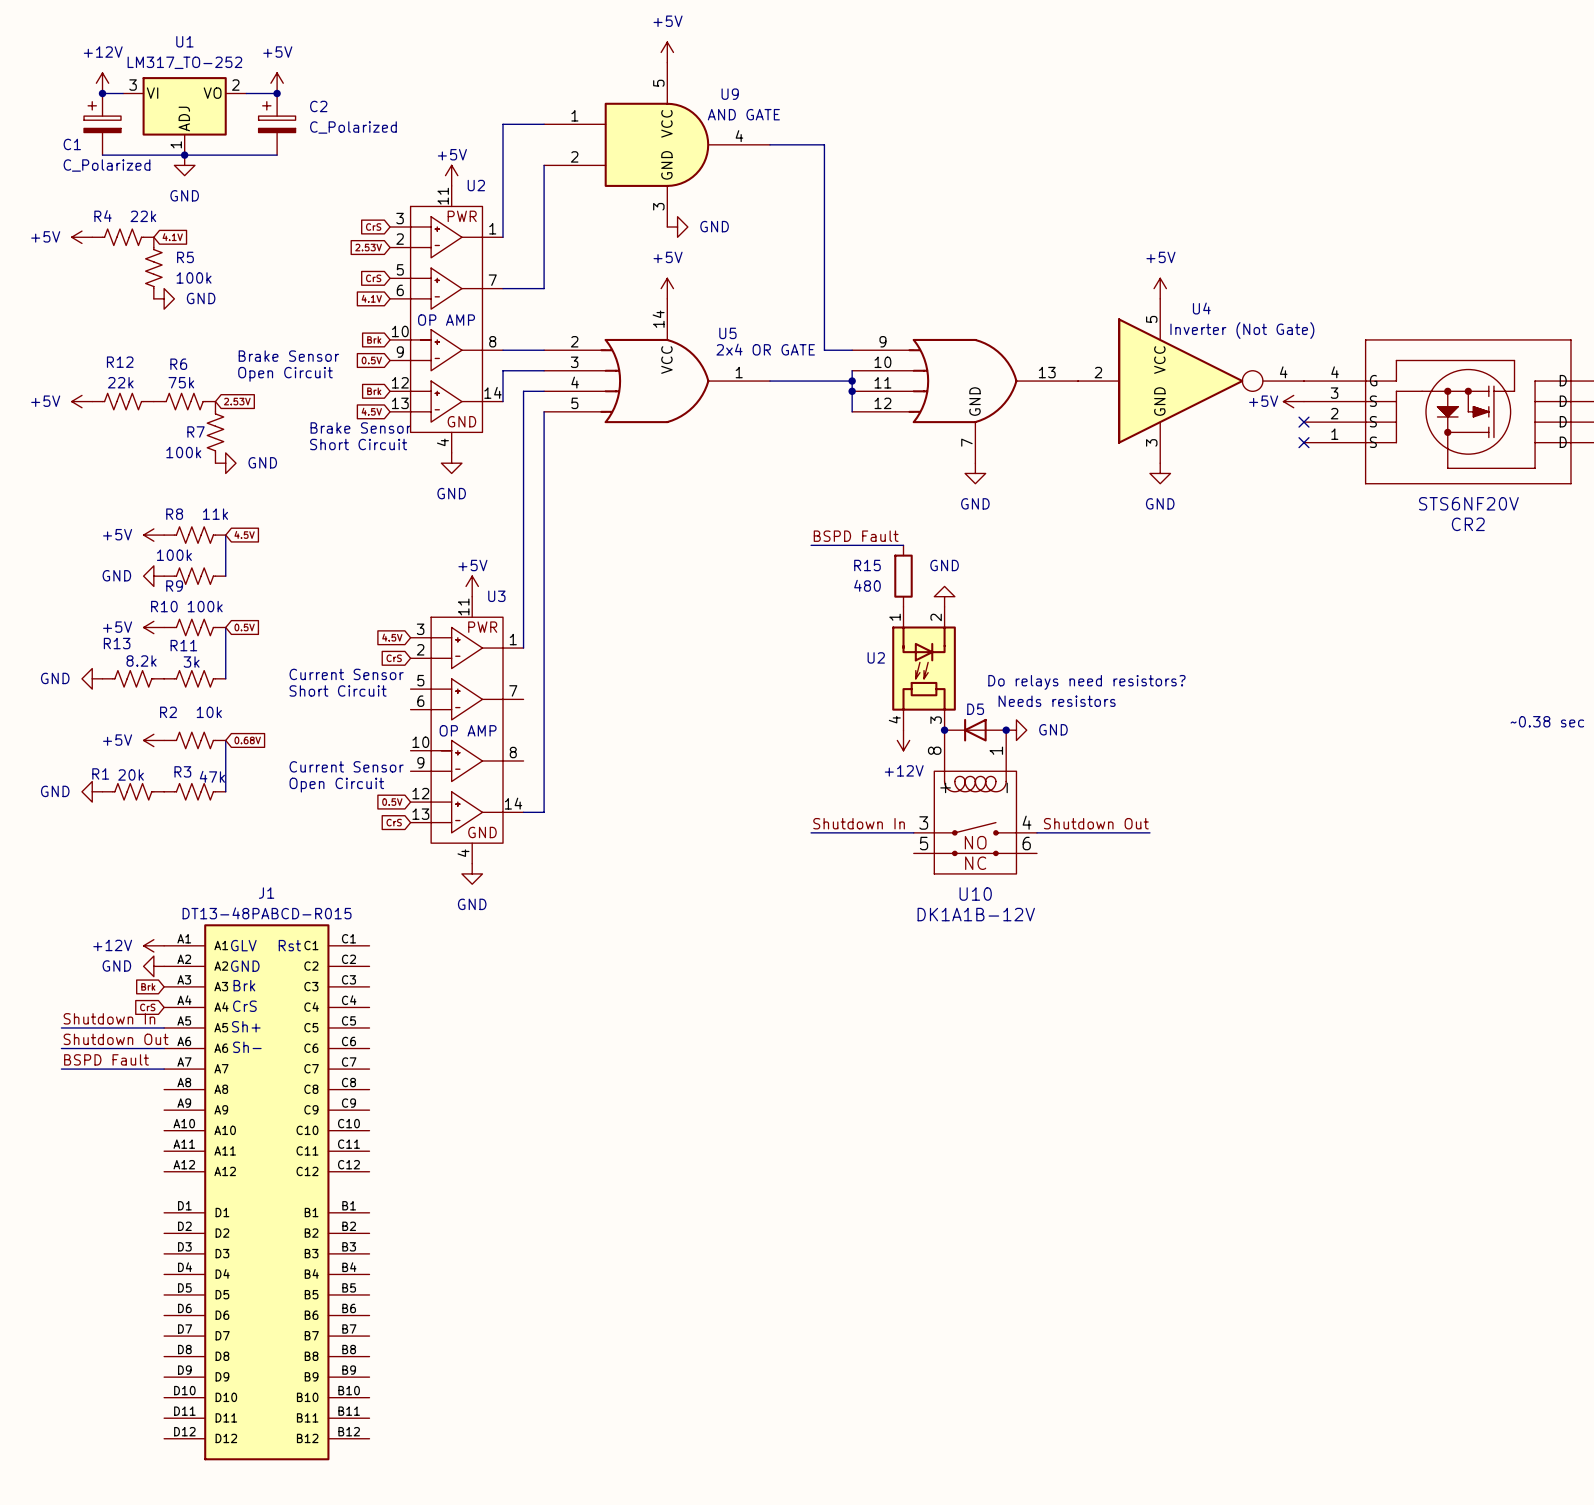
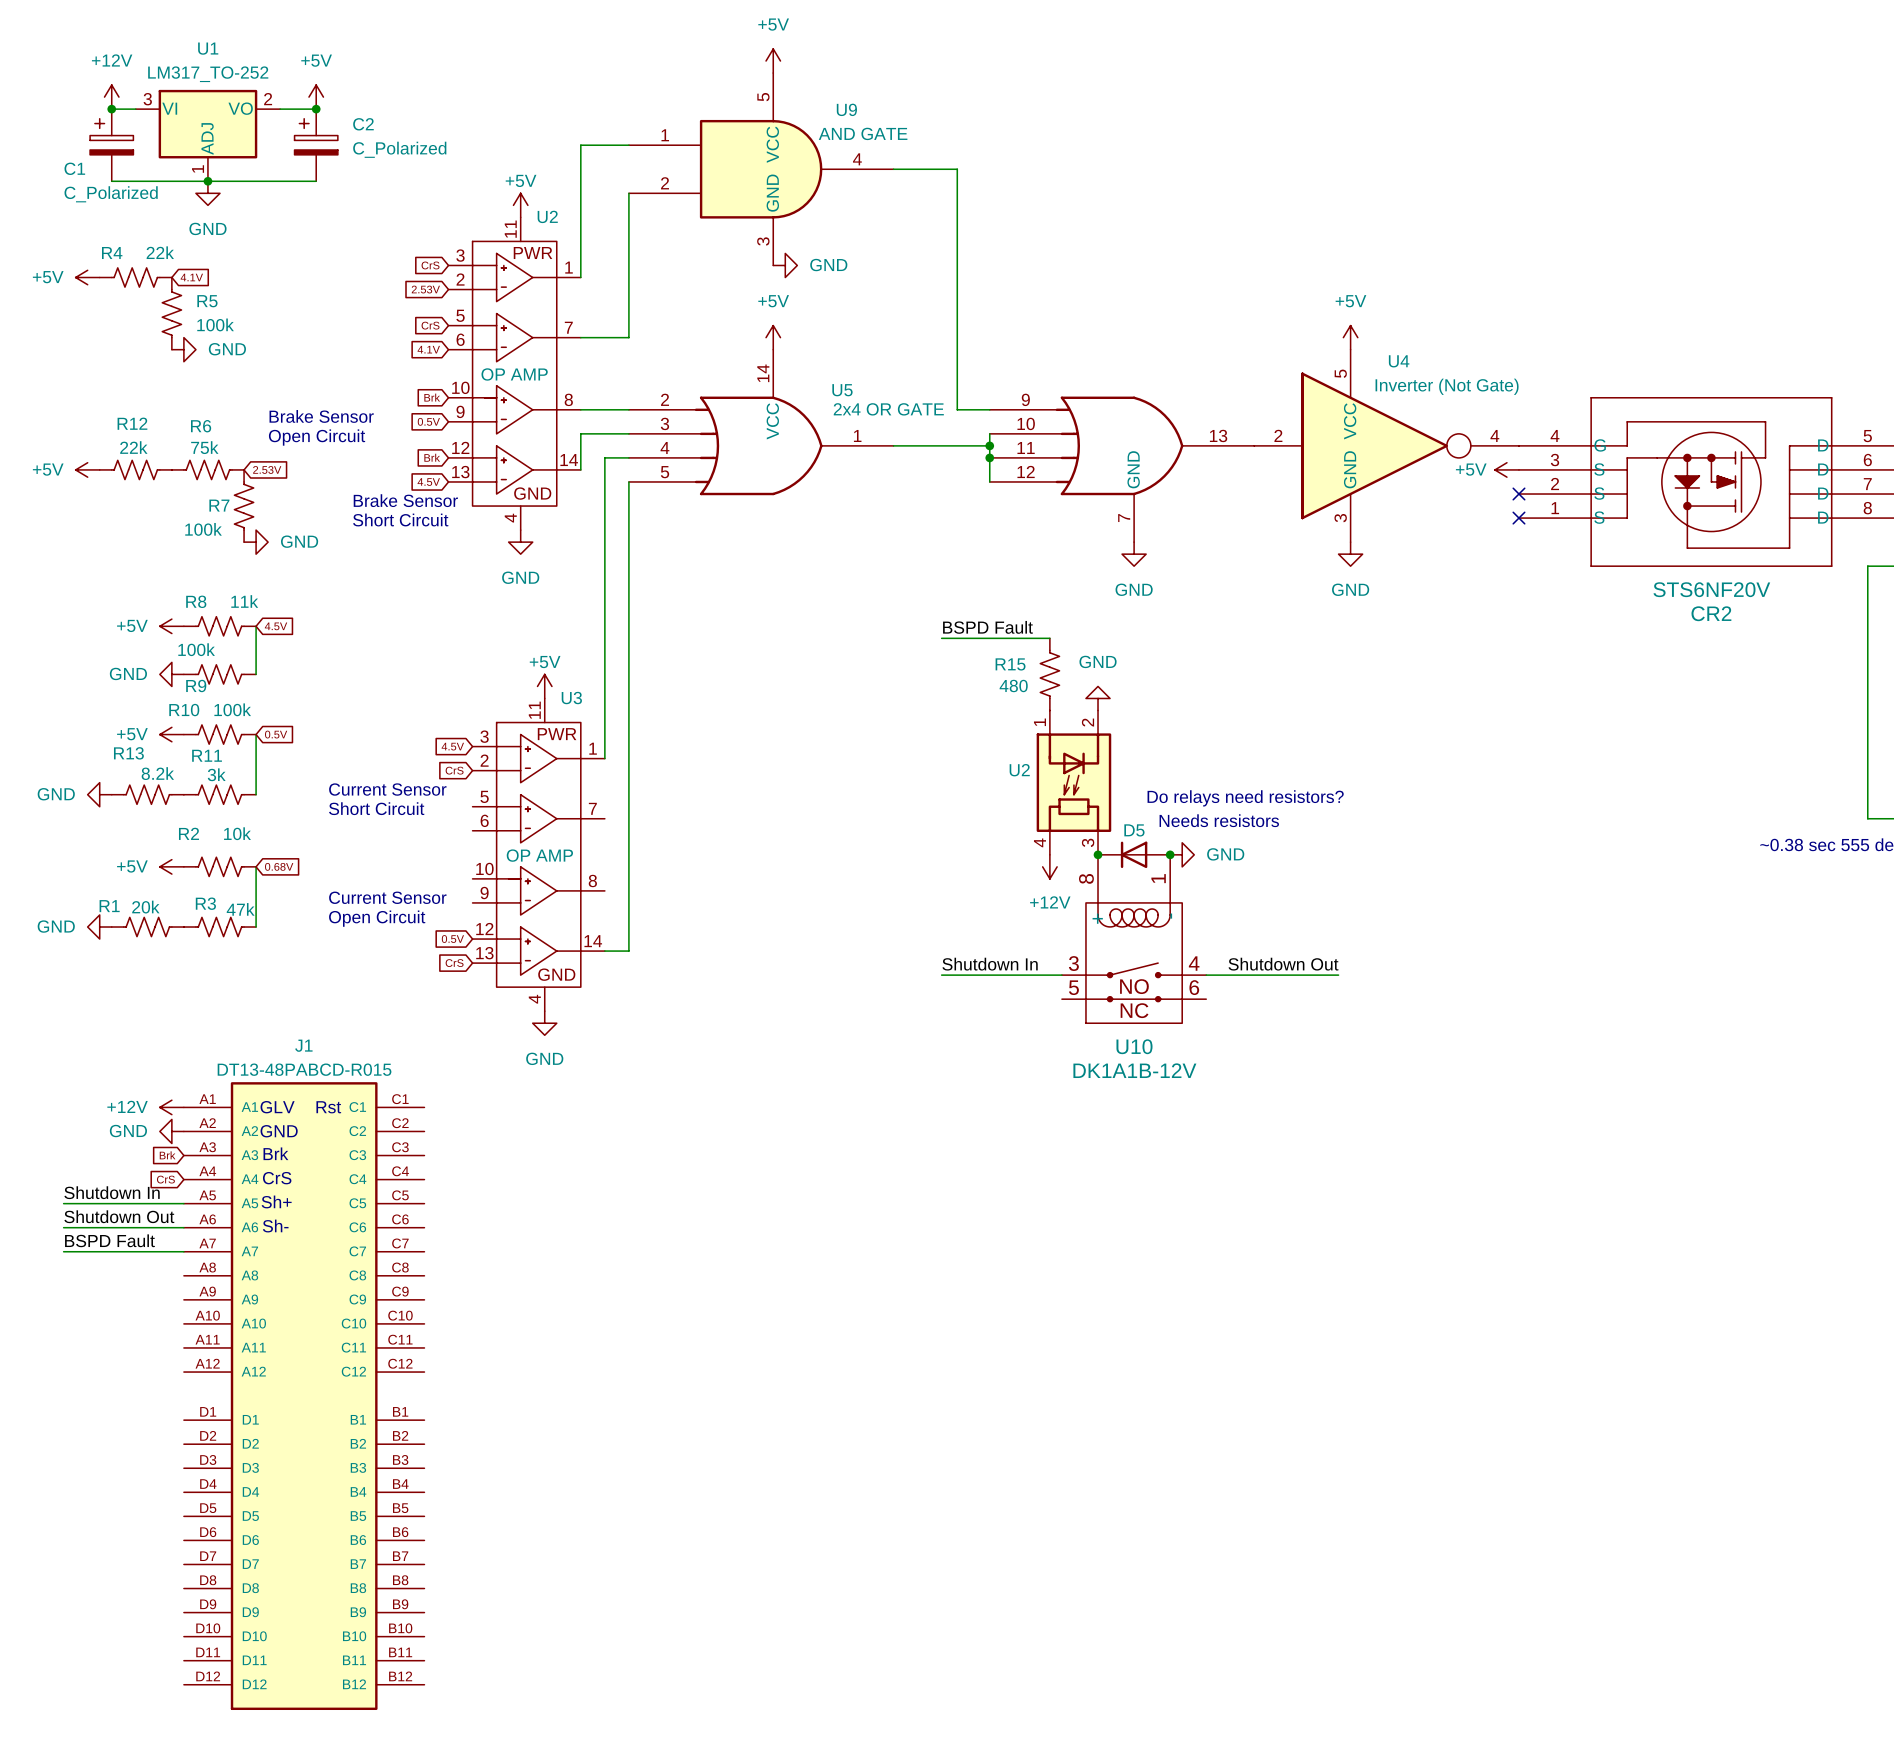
R15 symbol: [894, 545, 913, 607] -> [1040, 638, 1060, 711]

